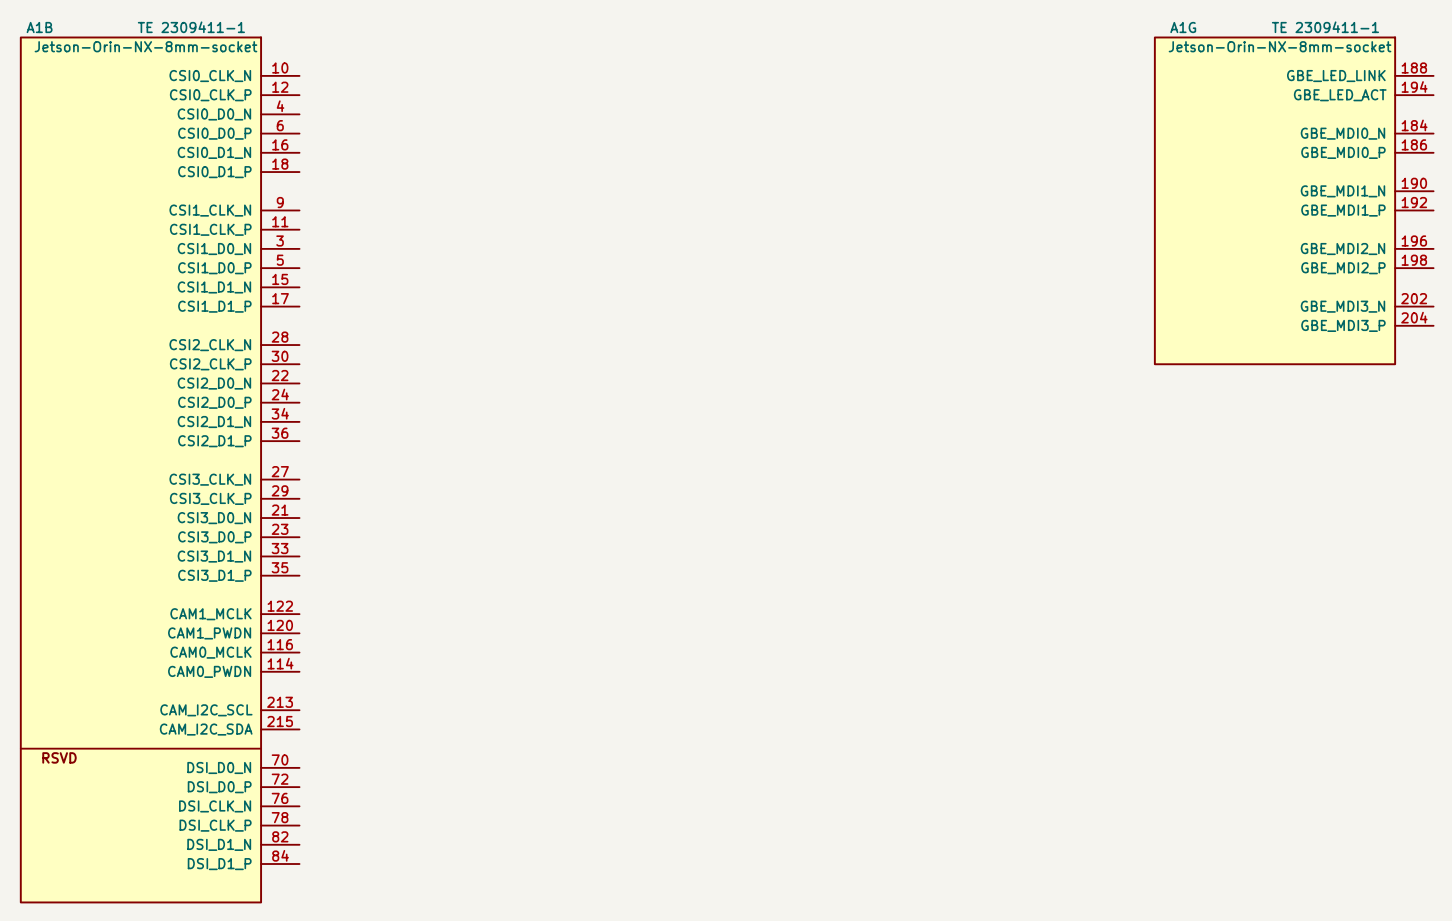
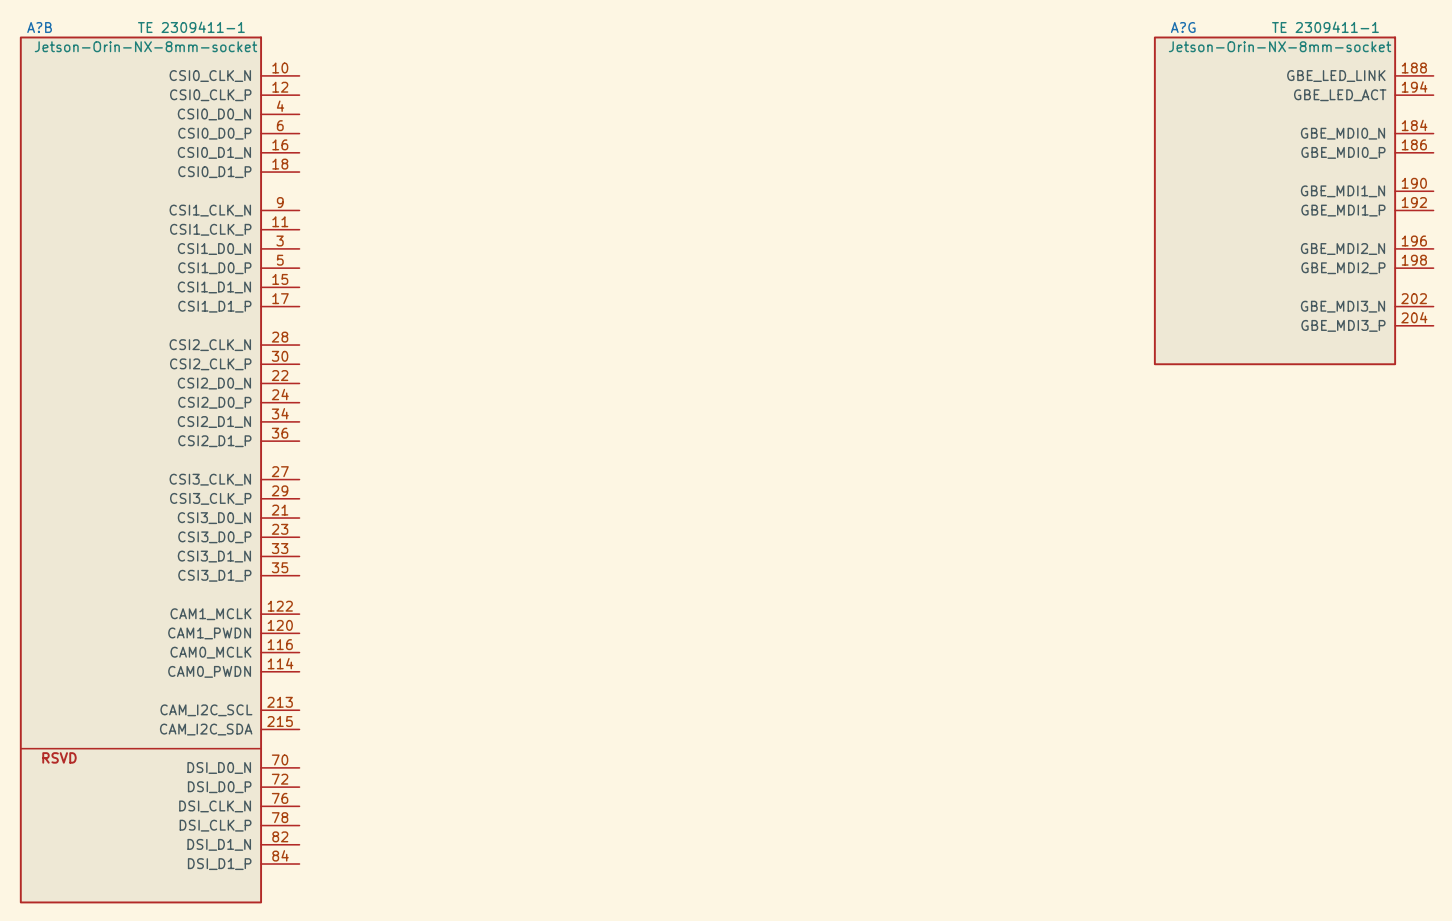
A1B name: A1B (39, 27) -> A?B (39, 27)
A1G name: A1G (1183, 27) -> A?G (1183, 27)

